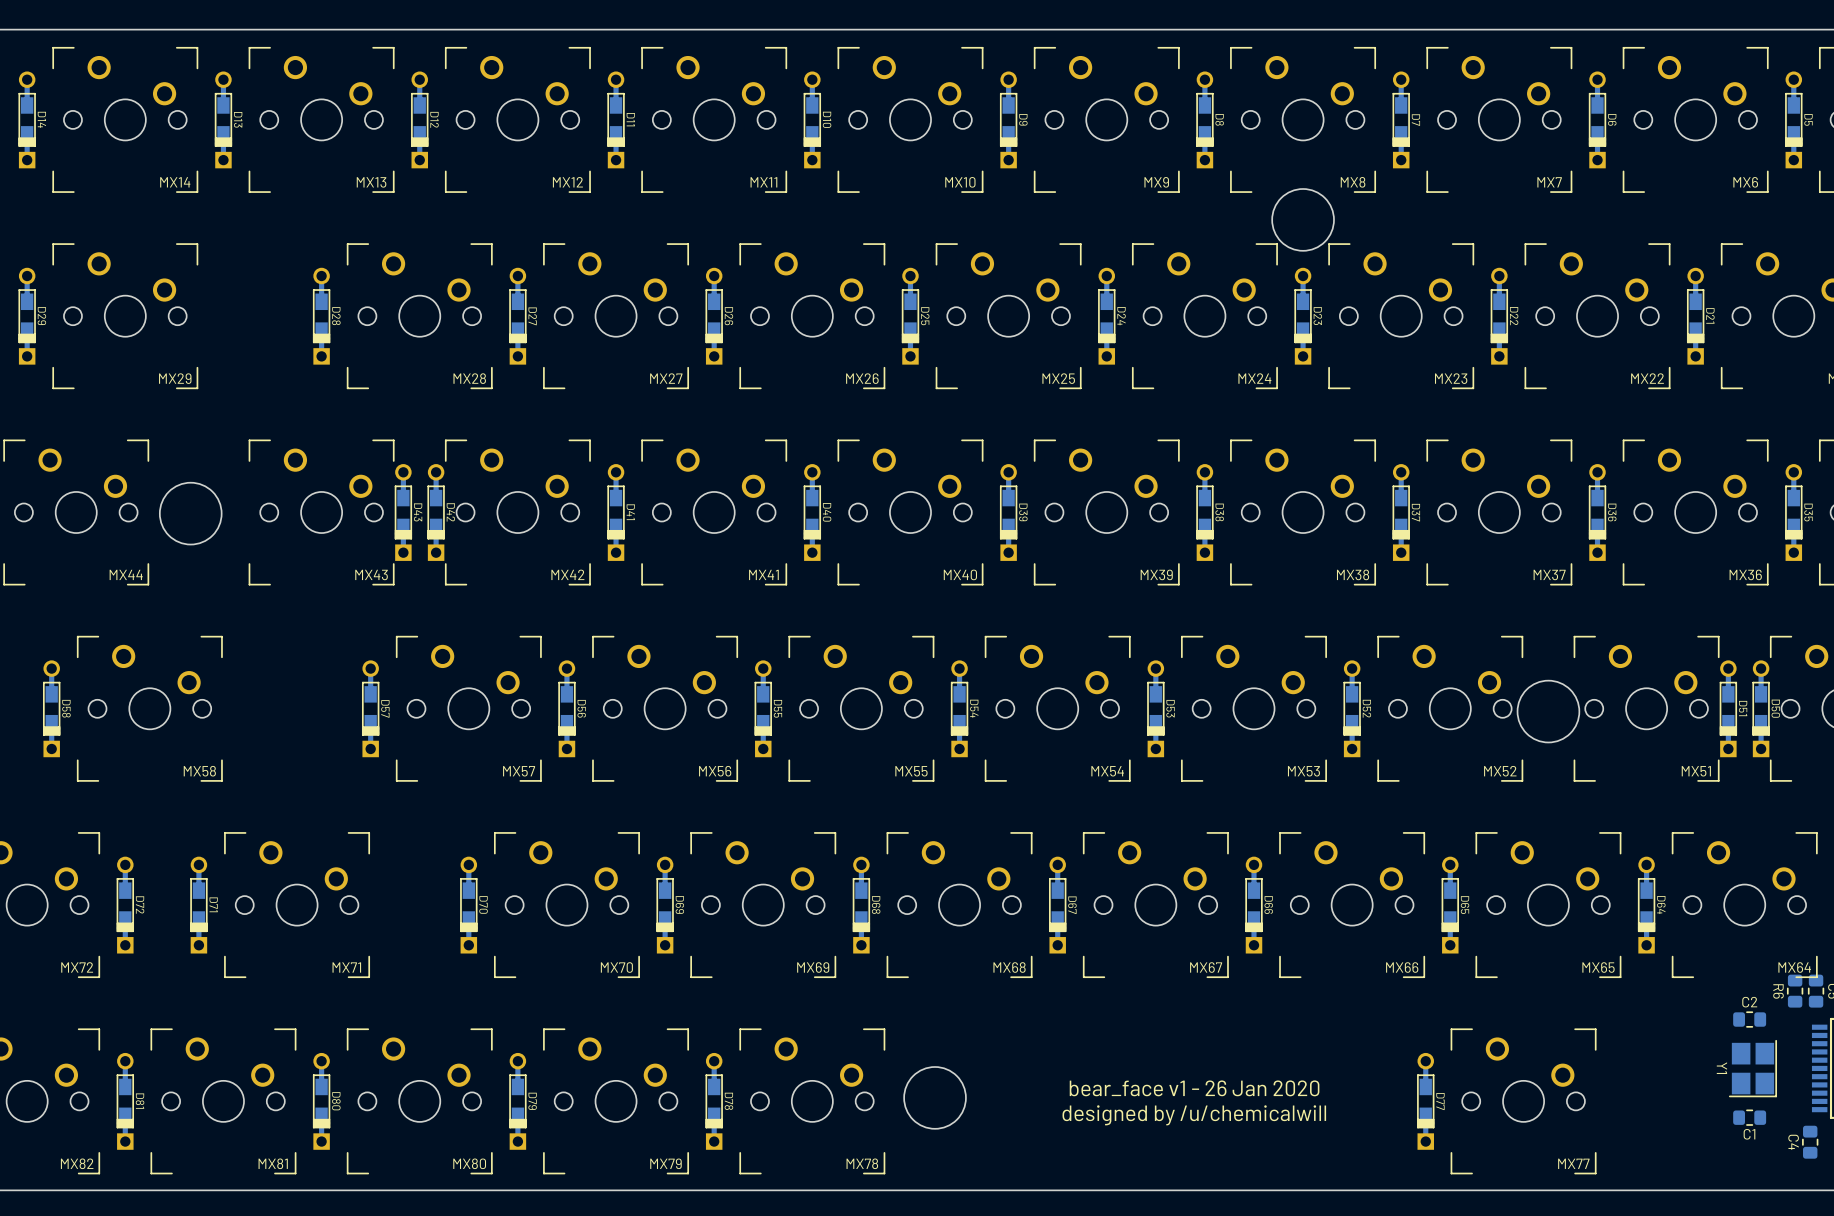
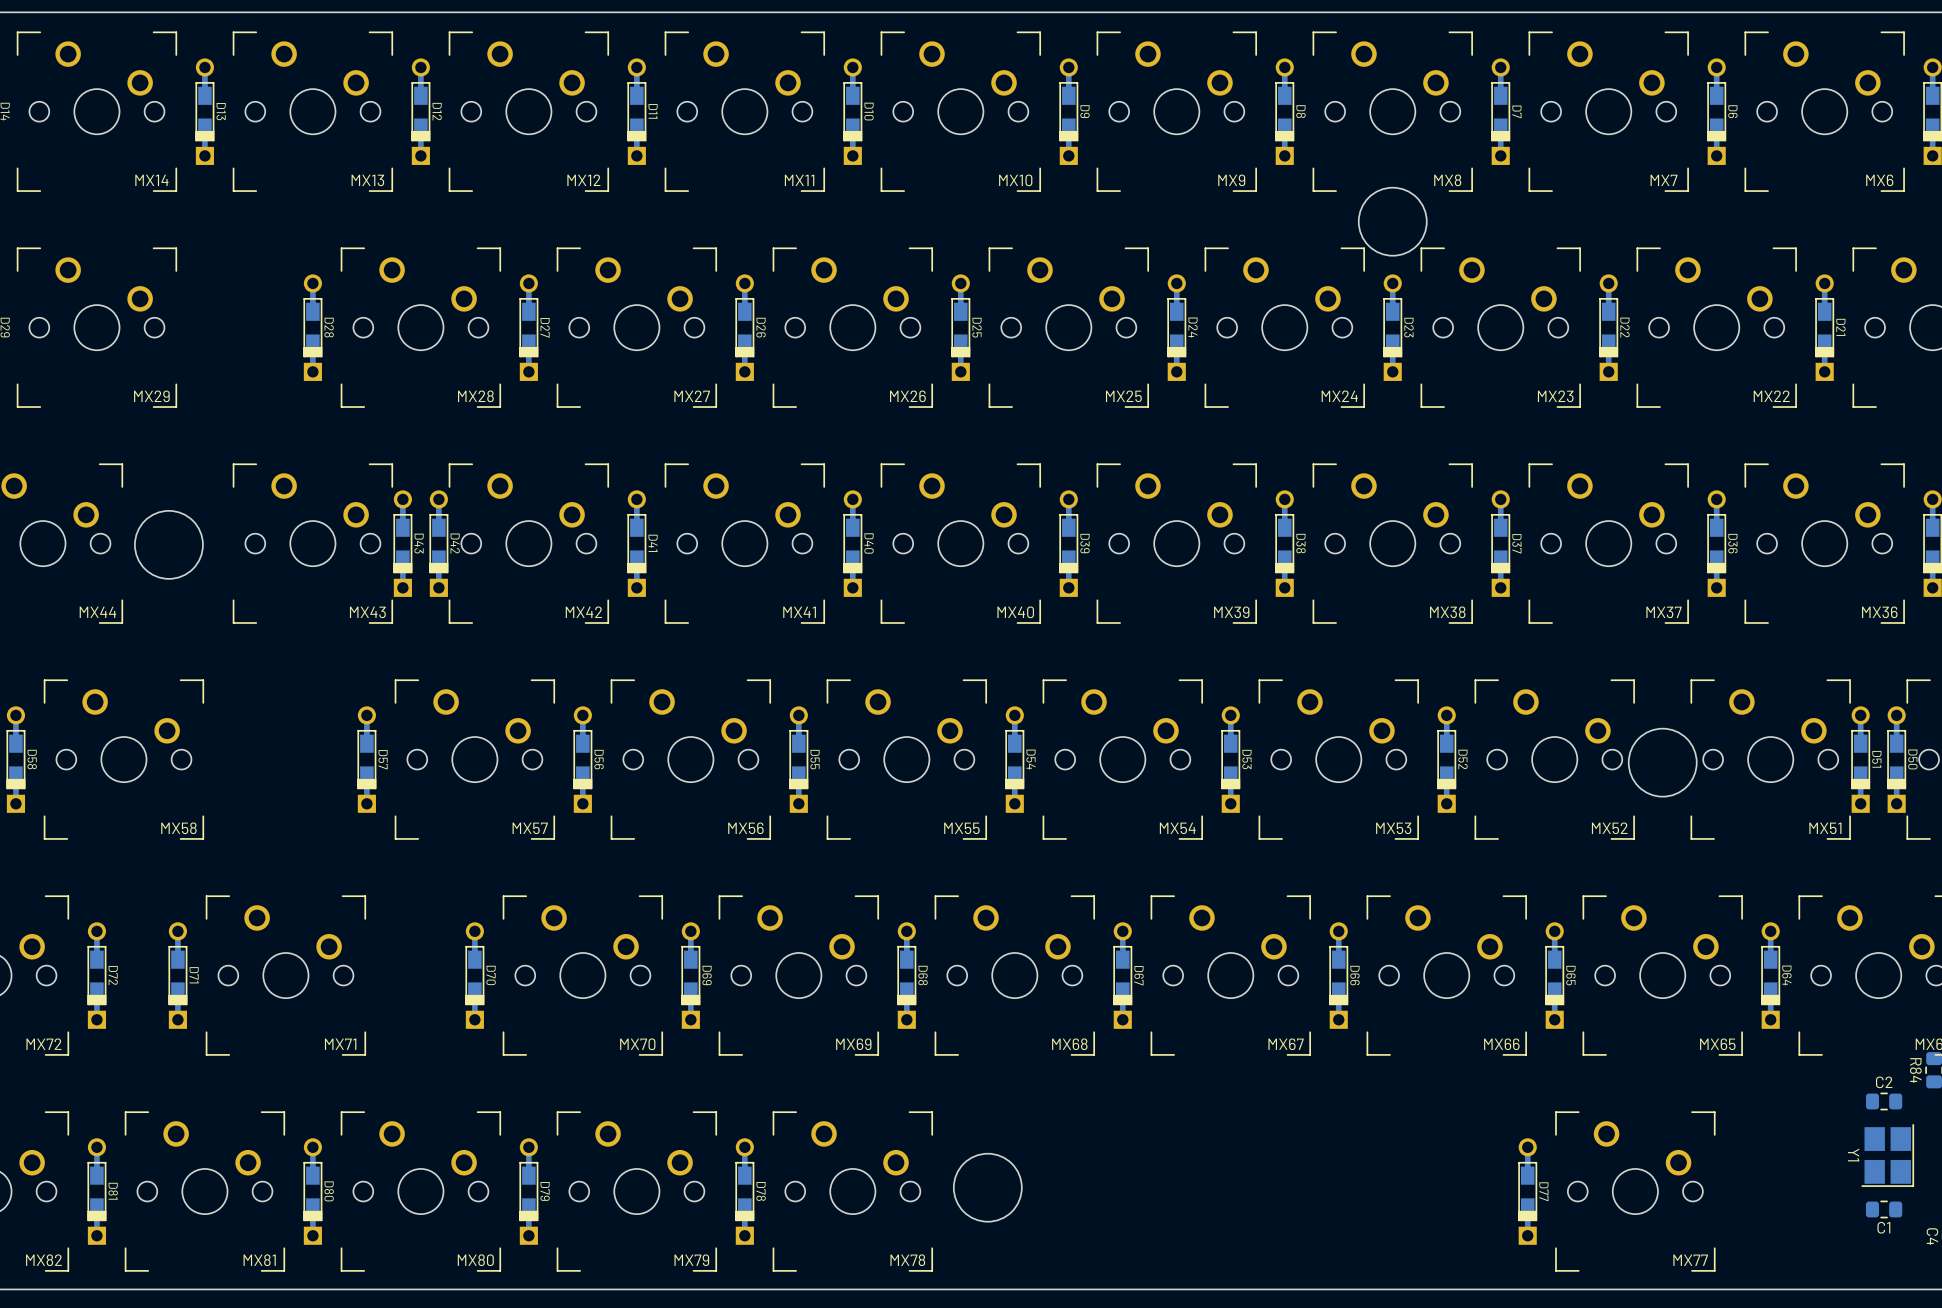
R6 name: R6 (1778, 991) -> R84 (1915, 1070)
text: bear_face v1 - 26 Jan 2020 (1194, 1088) -> none
text: designed by /u/chemicalwill (1194, 1115) -> none

